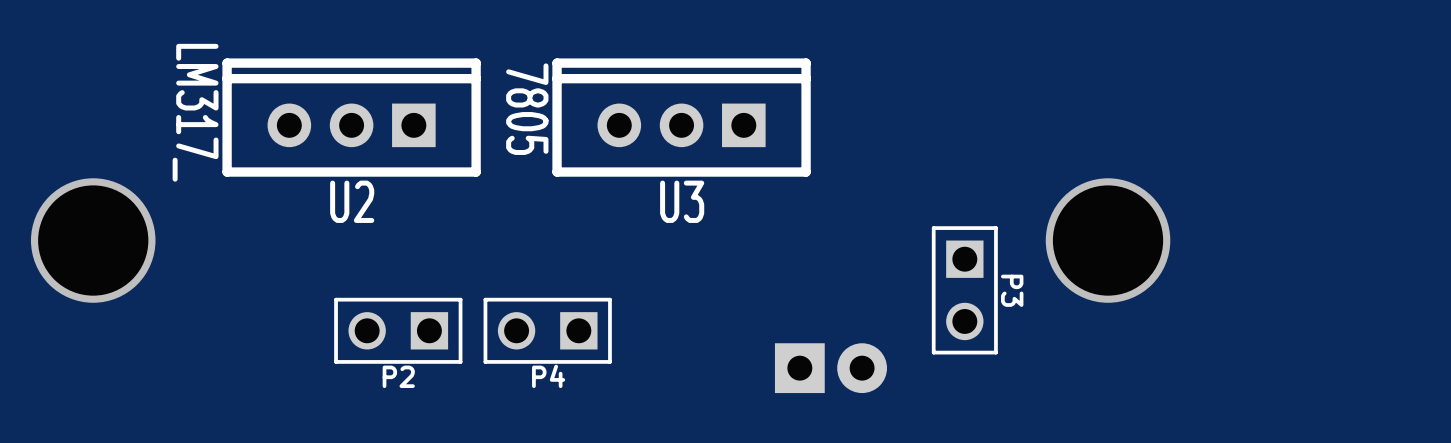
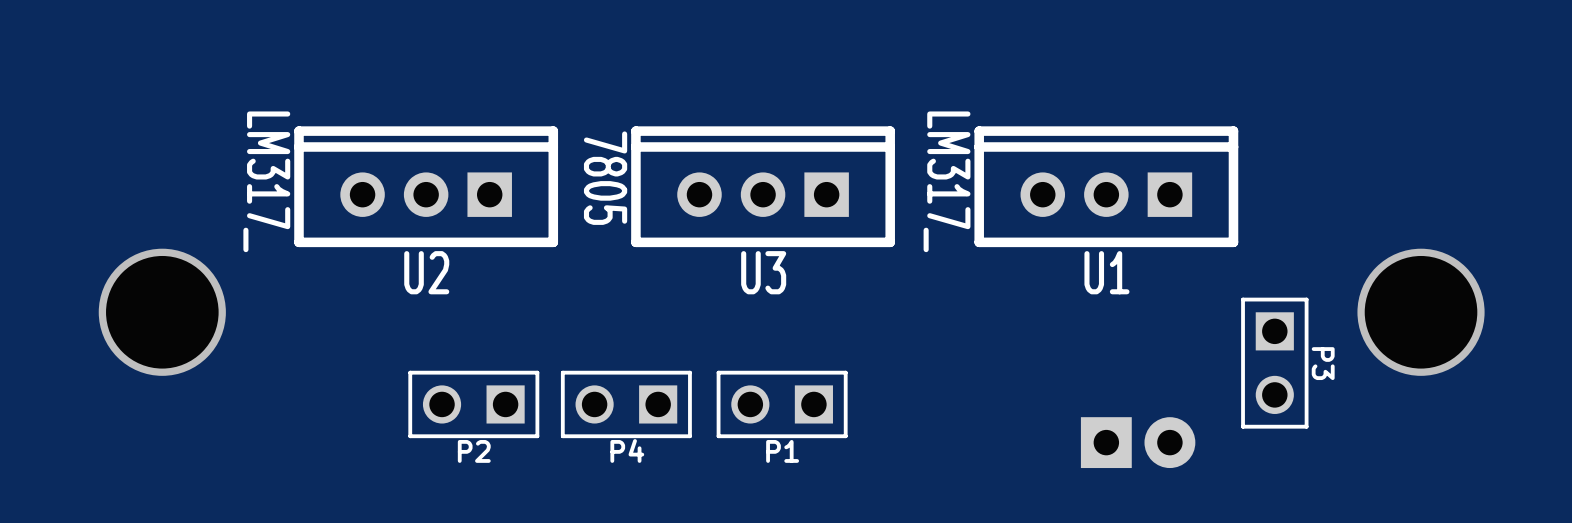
U1: none -> LM317_ (1106, 186)
via: (1108, 240) -> none
via: none -> (1421, 312)
P3 position: (964, 290) -> (1274, 363)
P1: none -> (782, 404)
part position: (830, 368) -> (1138, 442)

